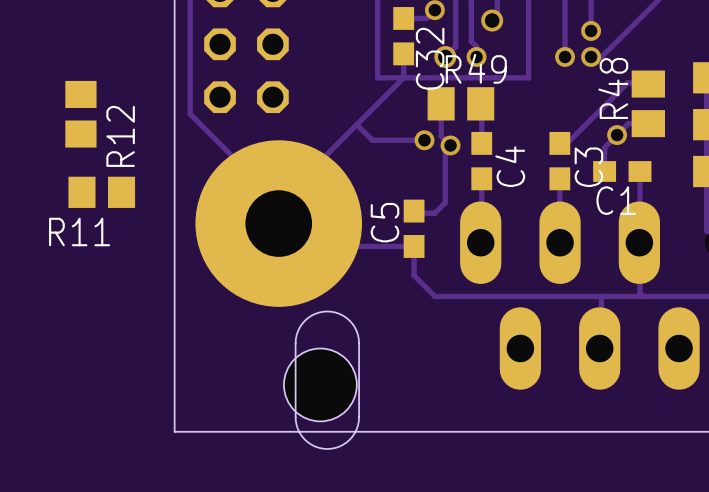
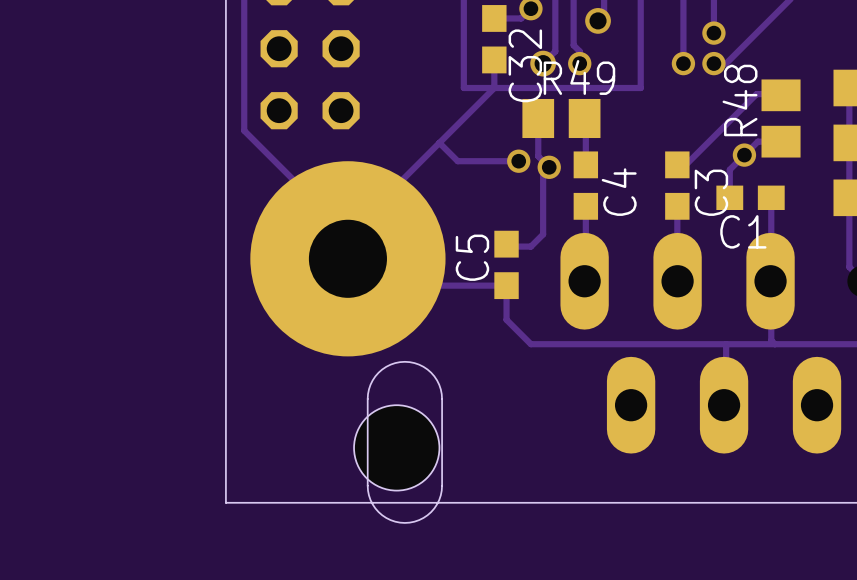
R12: (80, 114) -> none
R11: (101, 192) -> none

